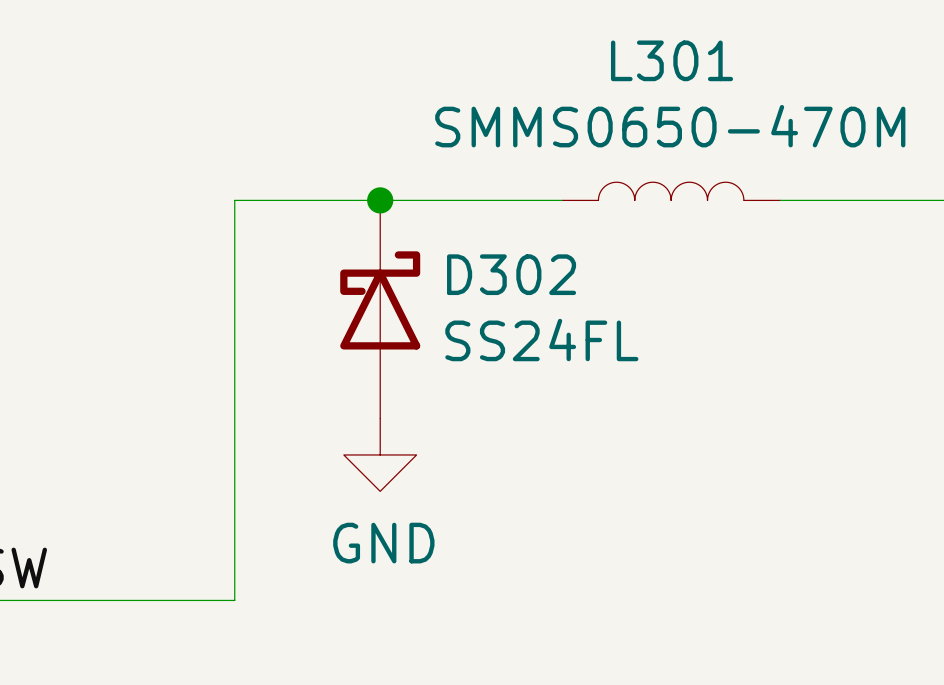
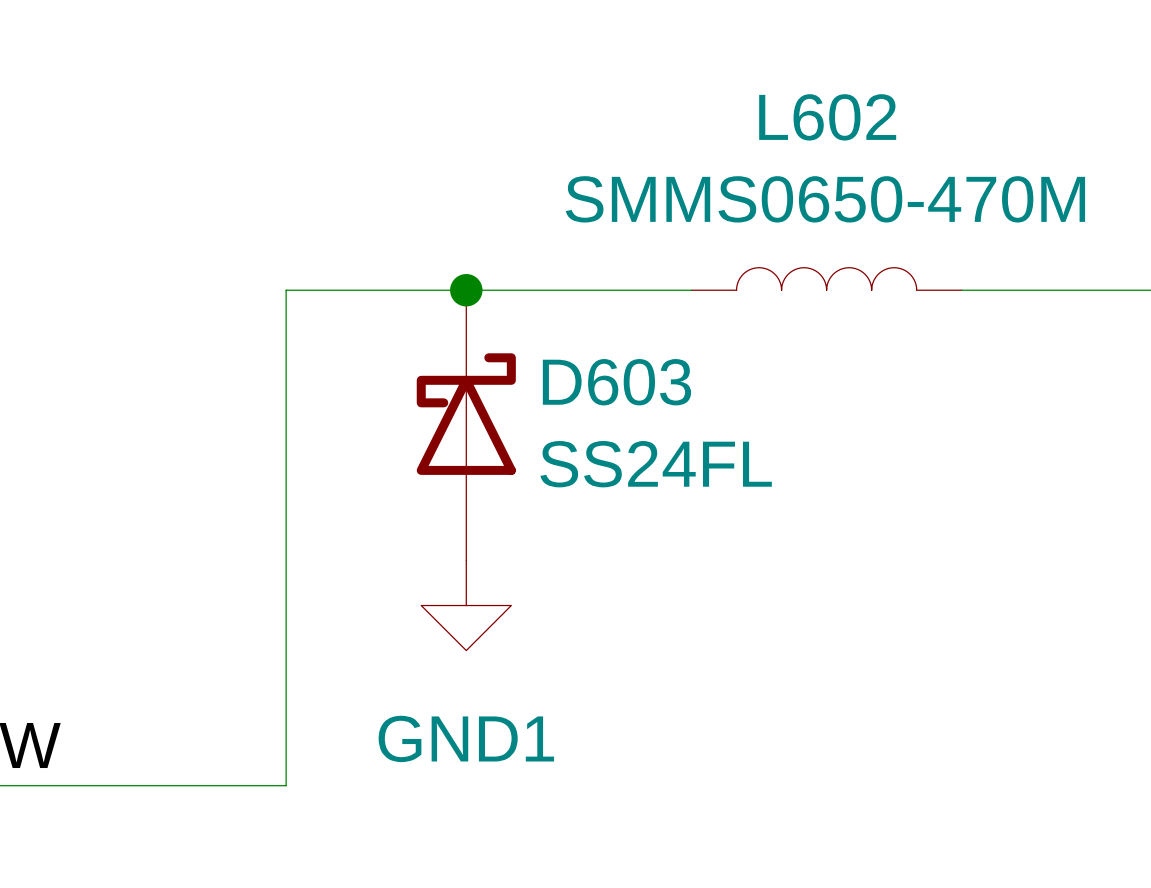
L301 name: L301 (672, 60) -> L602 (827, 117)
D302 name: D302 (511, 274) -> D603 (616, 382)
power symbol: GND (380, 454) -> GND1 (466, 605)

